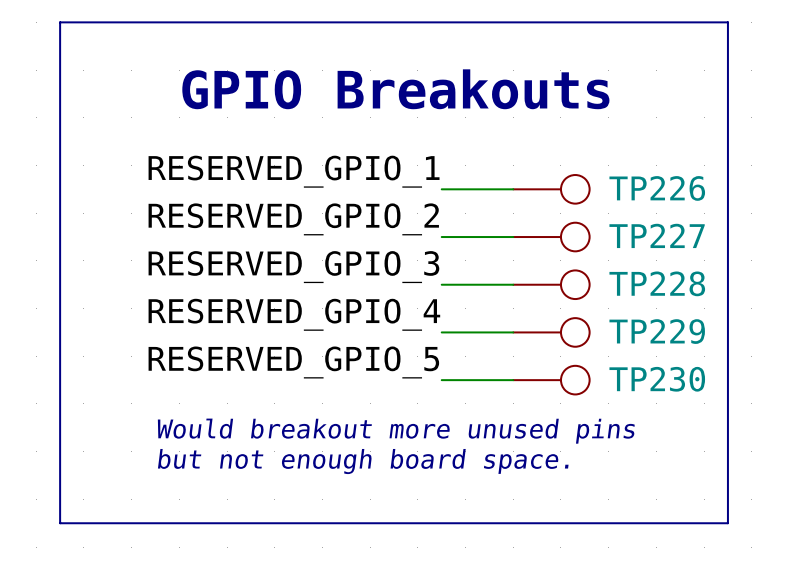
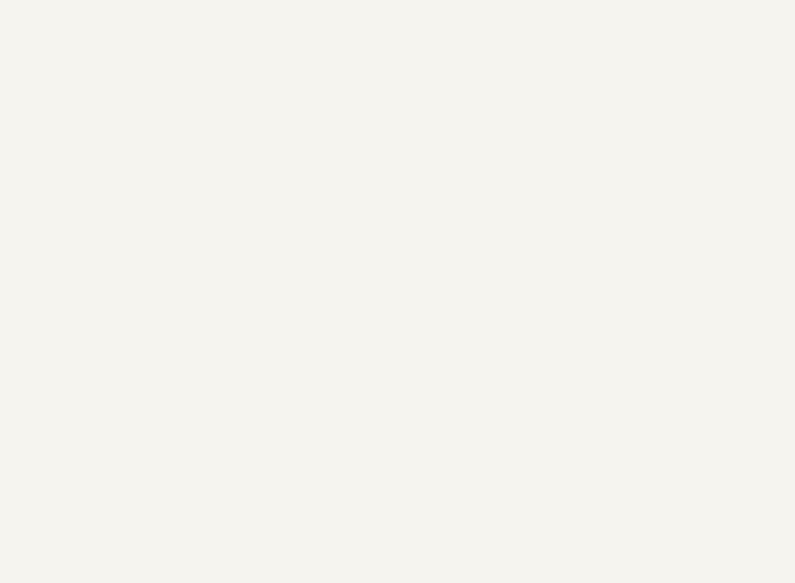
line: (60, 22) (727, 22) (727, 523) (60, 523) (60, 22) -> none
text: GPIO Breakouts (395, 89) -> none
label: RESERVED_GPIO_1 (294, 171) -> none
wire: (441, 189) (513, 189) -> none
TP226: (551, 189) -> none
label: RESERVED_GPIO_2 (293, 219) -> none
wire: (441, 237) (513, 237) -> none
TP227: (551, 237) -> none
label: RESERVED_GPIO_3 (293, 267) -> none
wire: (441, 284) (513, 284) -> none
TP228: (551, 284) -> none
label: RESERVED_GPIO_4 (294, 314) -> none
wire: (441, 332) (513, 332) -> none
TP229: (551, 332) -> none
label: RESERVED_GPIO_5 (293, 362) -> none
wire: (441, 380) (513, 380) -> none
TP230: (551, 380) -> none
text: Would breakout more unused pins (396, 431) -> none
text: but not enough board space. (363, 461) -> none

